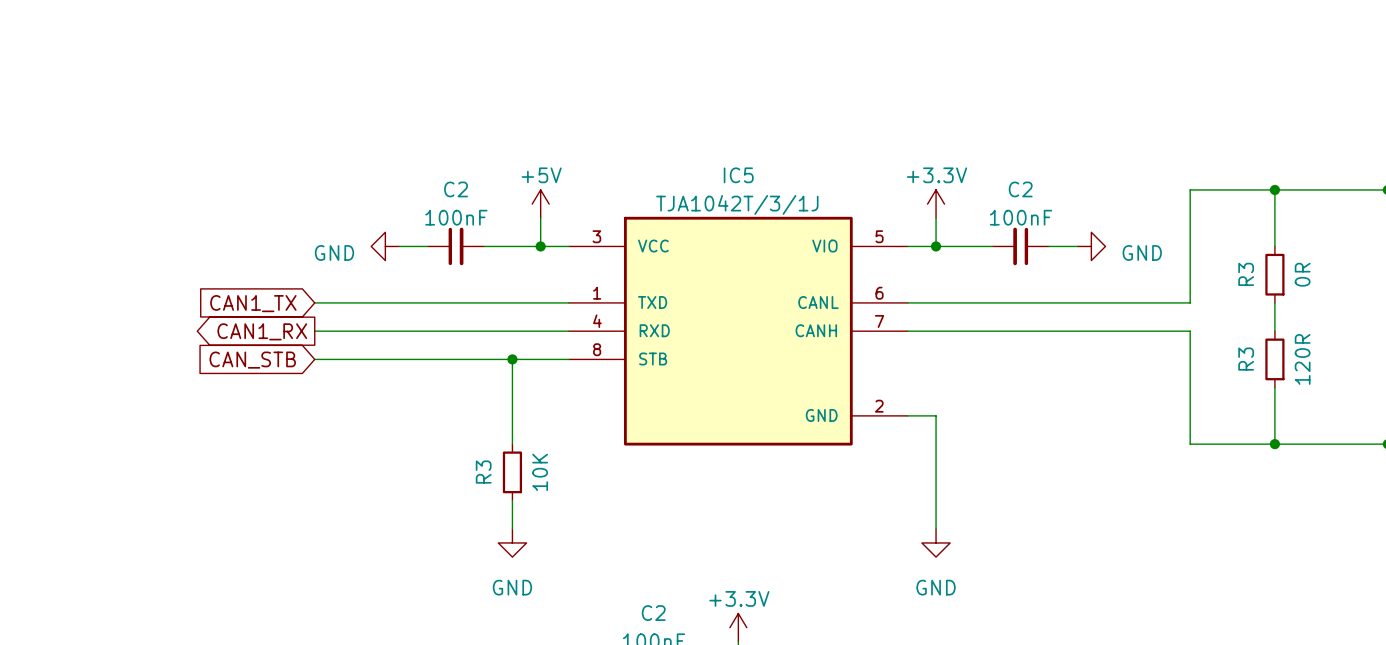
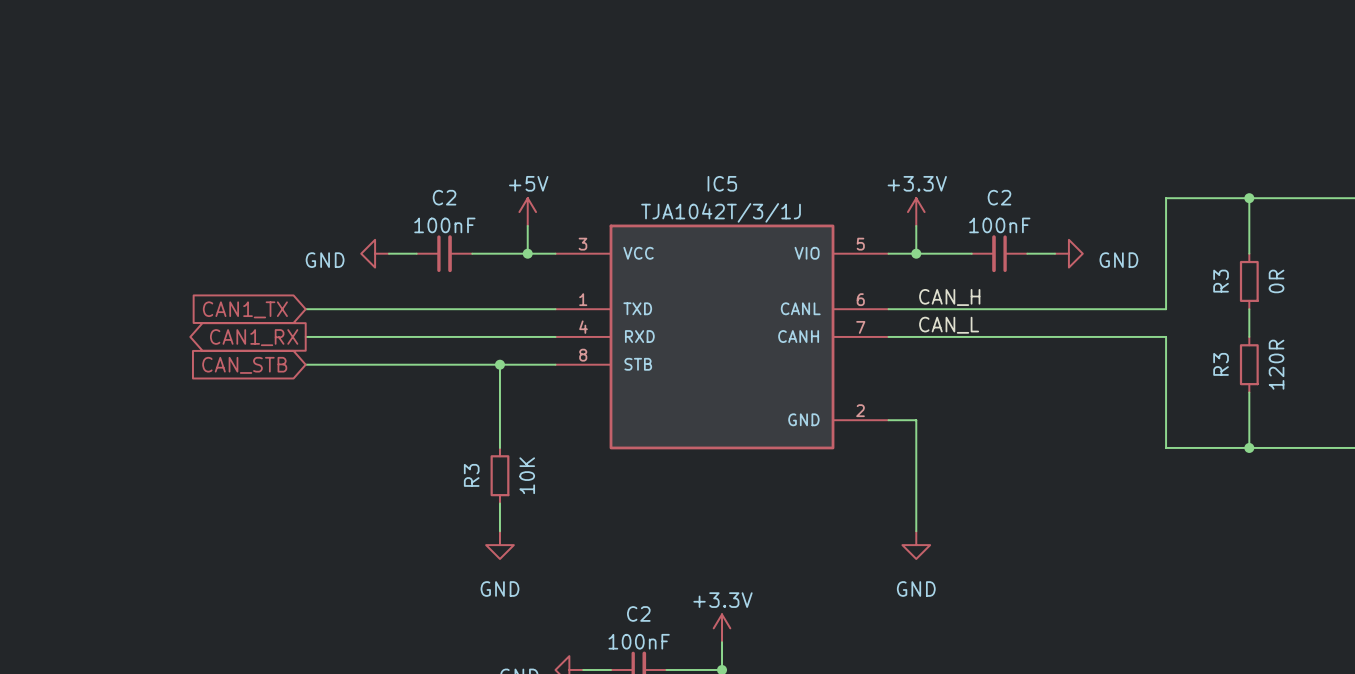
label: none -> CAN_H (949, 297)
label: none -> CAN_L (949, 325)

